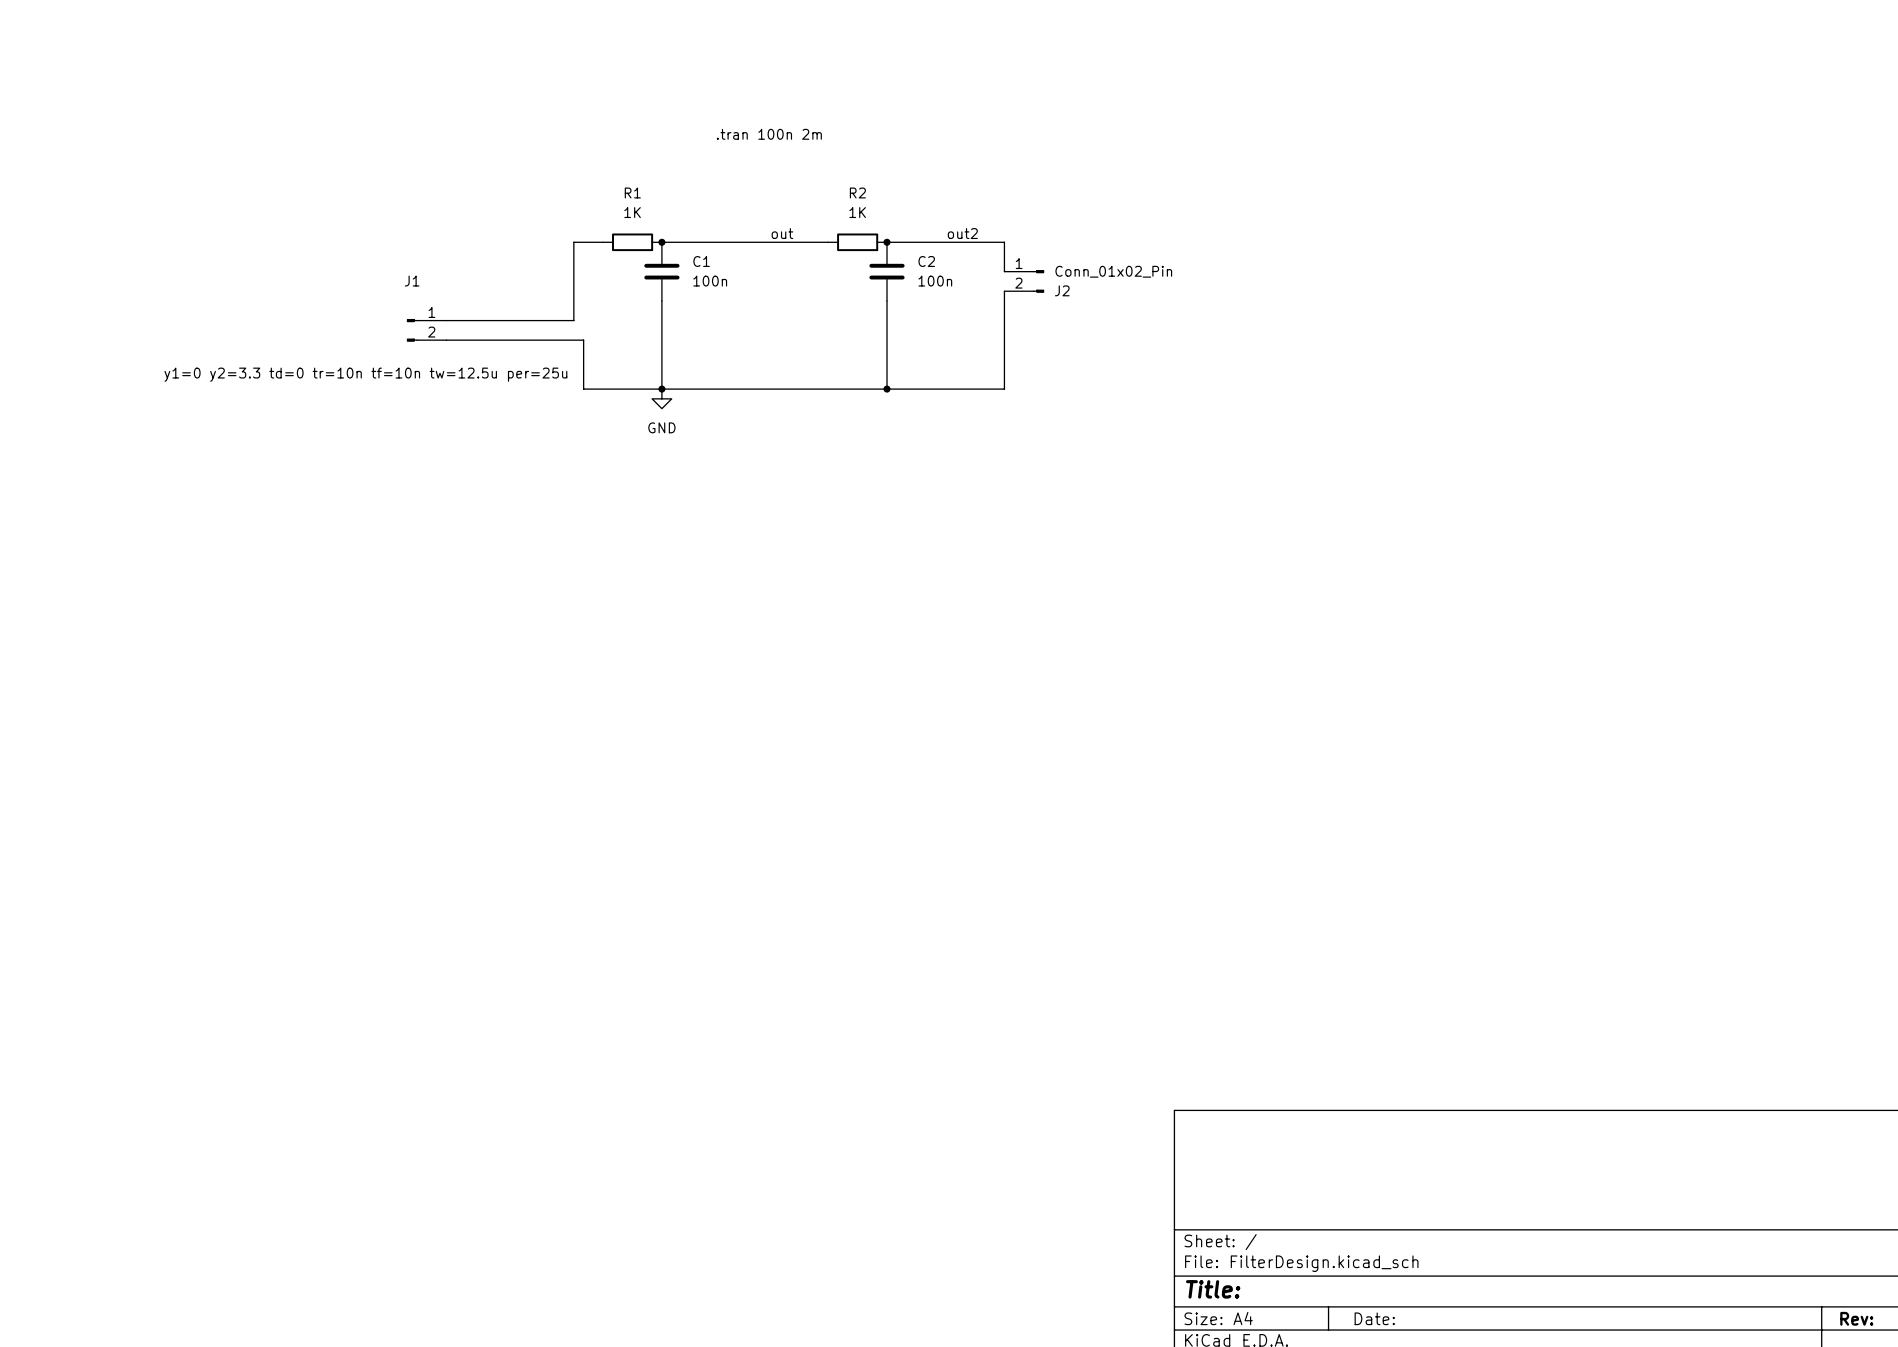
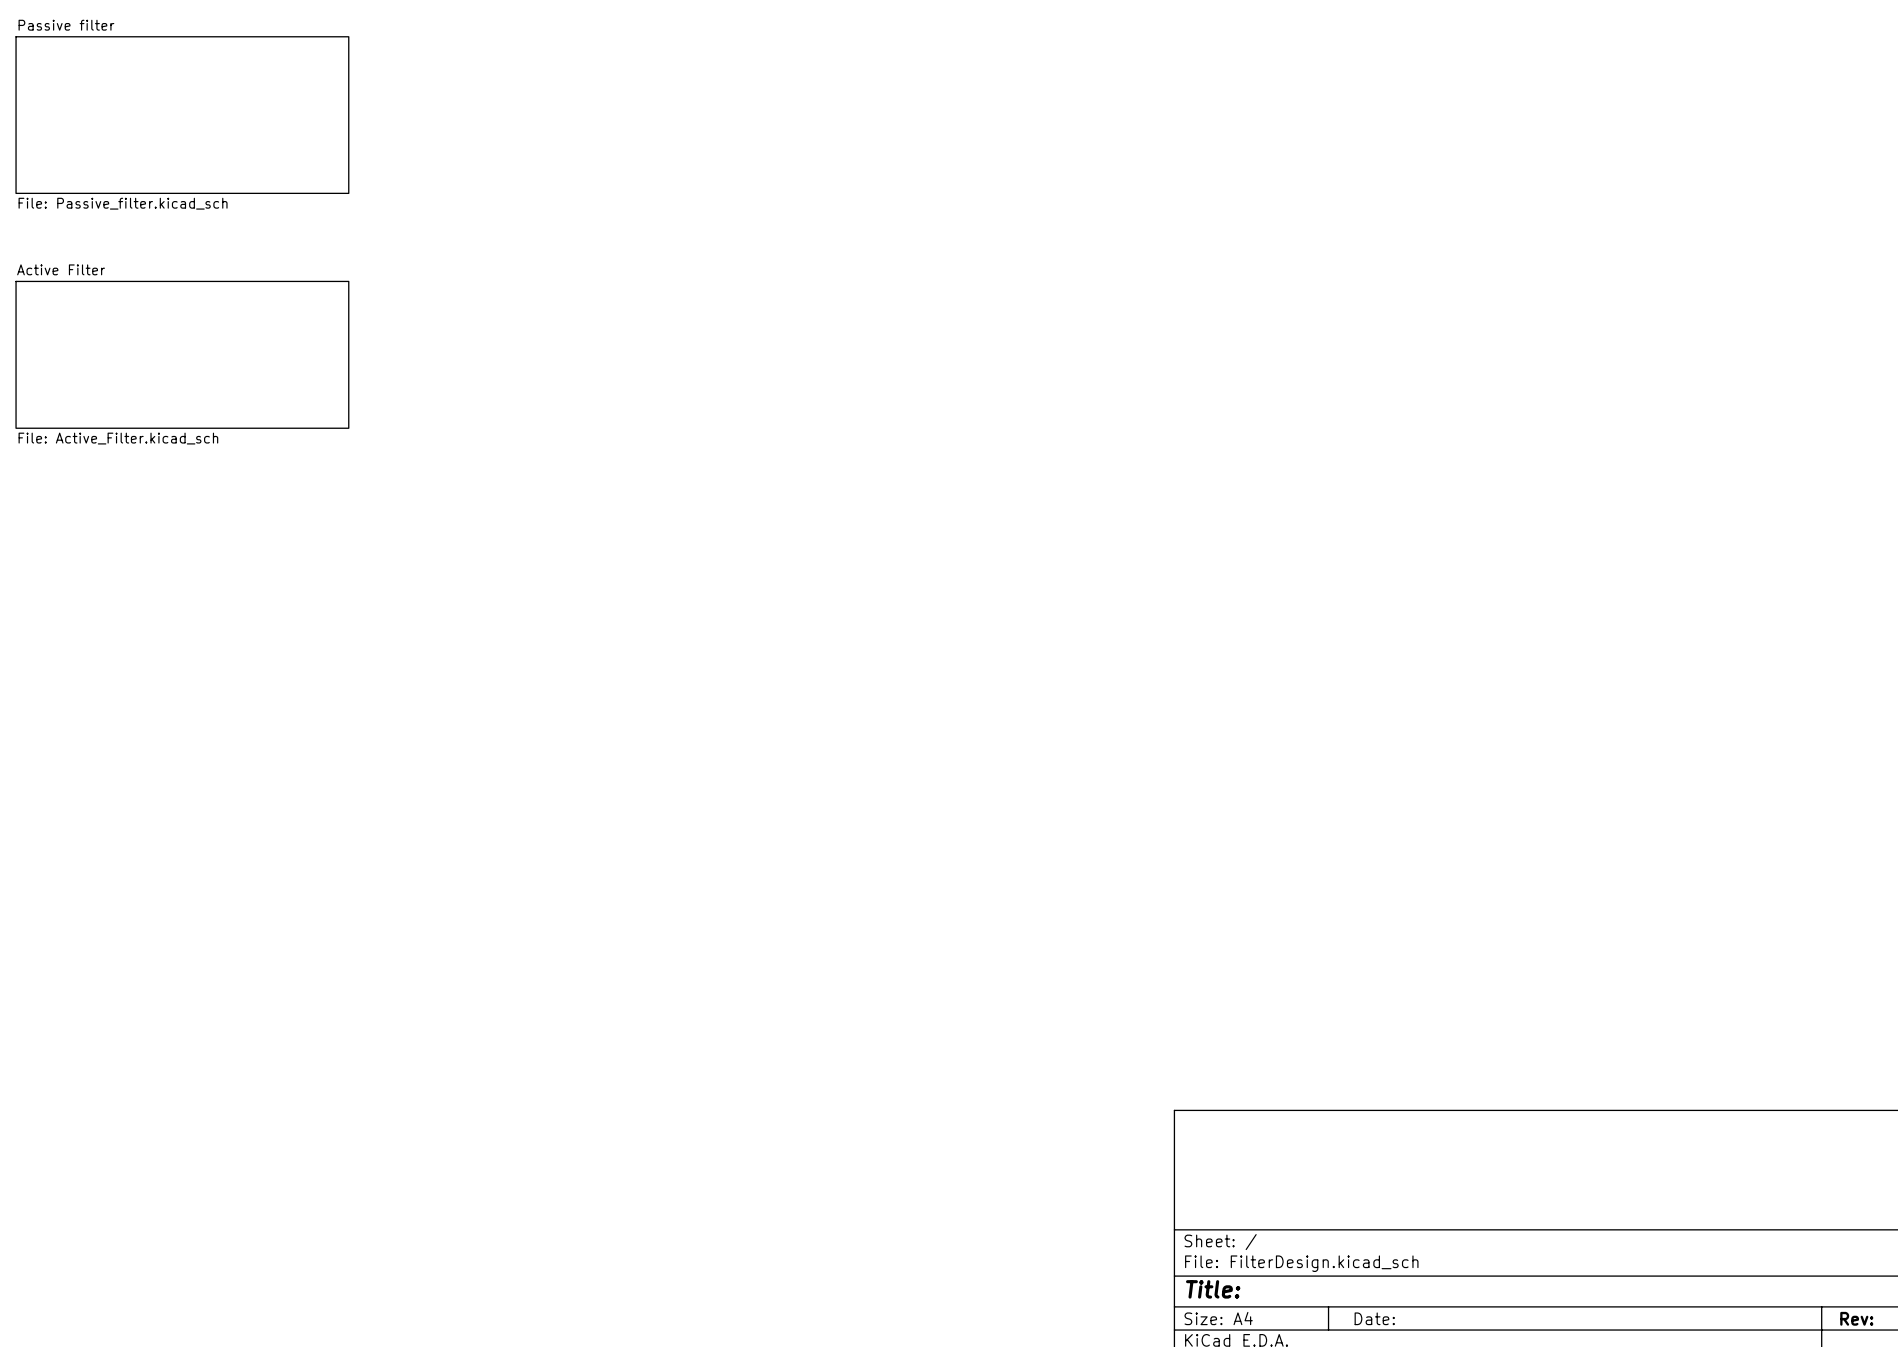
sheet Passive filter: none -> File: Passive_filter.kicad_sch (182, 115)
text: .tran 100n 2m (769, 134) -> none
label: out (782, 233) -> none
label: out2 (962, 233) -> none
wire: (603, 242) (573, 242) (573, 320) (446, 320) -> none
R1: 1K (632, 242) -> none
wire: (661, 242) (828, 242) -> none
junction: (661, 242) -> none
R2: 1K (857, 242) -> none
wire: (887, 242) (1004, 242) (1004, 271) -> none
junction: (887, 242) -> none
C1: 100n (661, 271) -> none
C2: 100n (887, 271) -> none
J2: Conn_01x02_Pin (1024, 281) -> none
wire: (1004, 291) (1004, 389) (583, 389) (583, 340) (446, 340) -> none
wire: (661, 301) (661, 389) -> none
wire: (887, 301) (887, 389) -> none
J1: y1=0 y2=3.3 td=0 tr=10n tf=10n tw=12.5u per=25u (426, 330) -> none
sheet Active Filter: none -> File: Active_Filter.kicad_sch (182, 354)
junction: (661, 389) -> none
junction: (887, 389) -> none
power symbol: GND (661, 398) -> none

